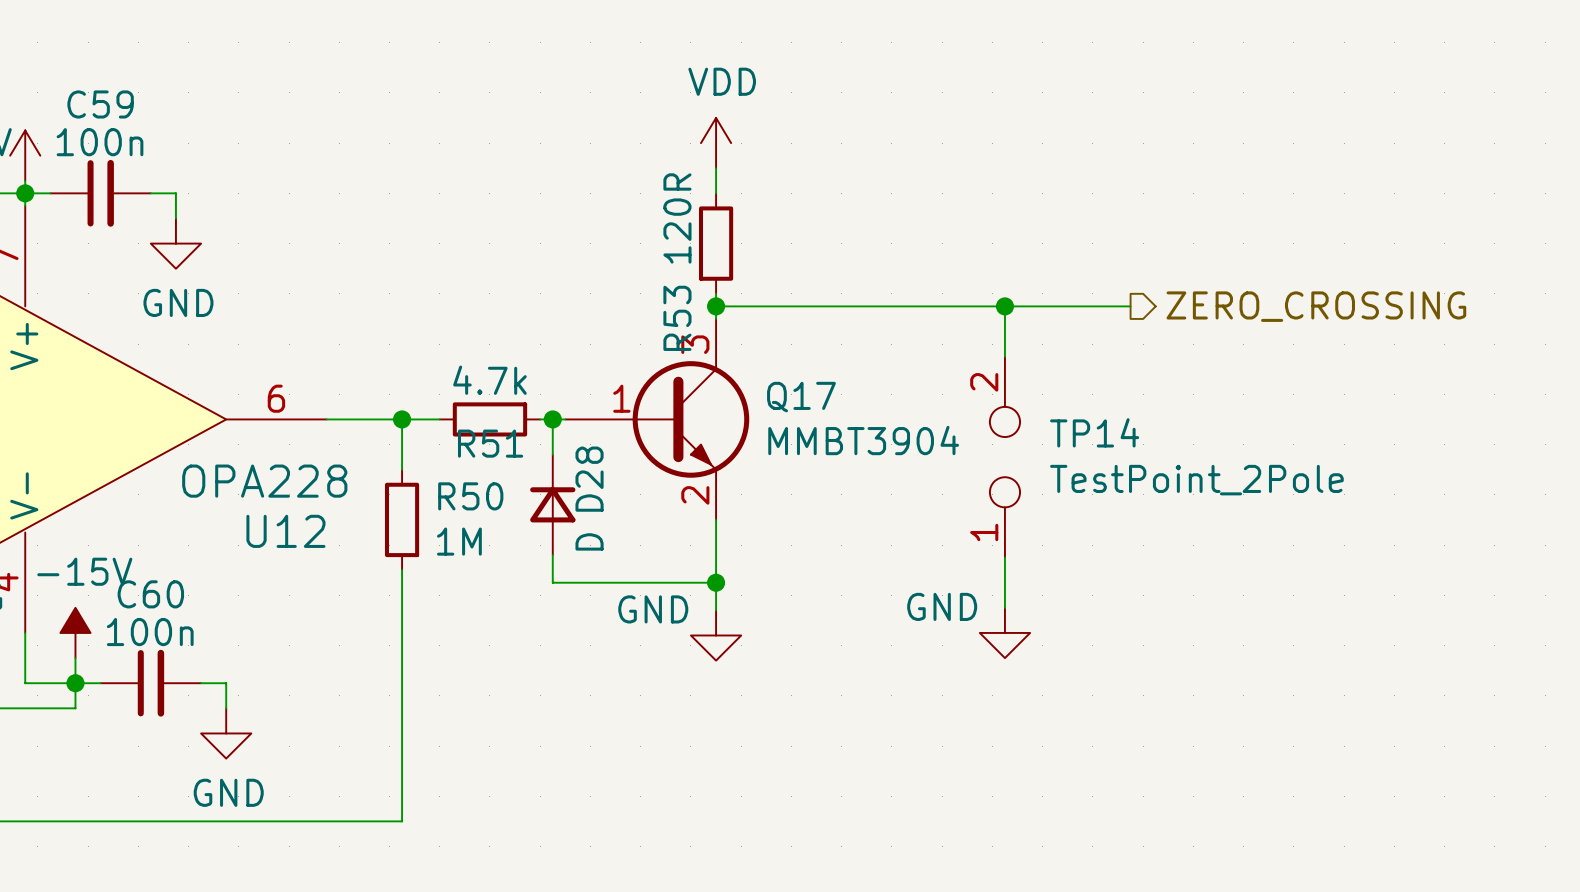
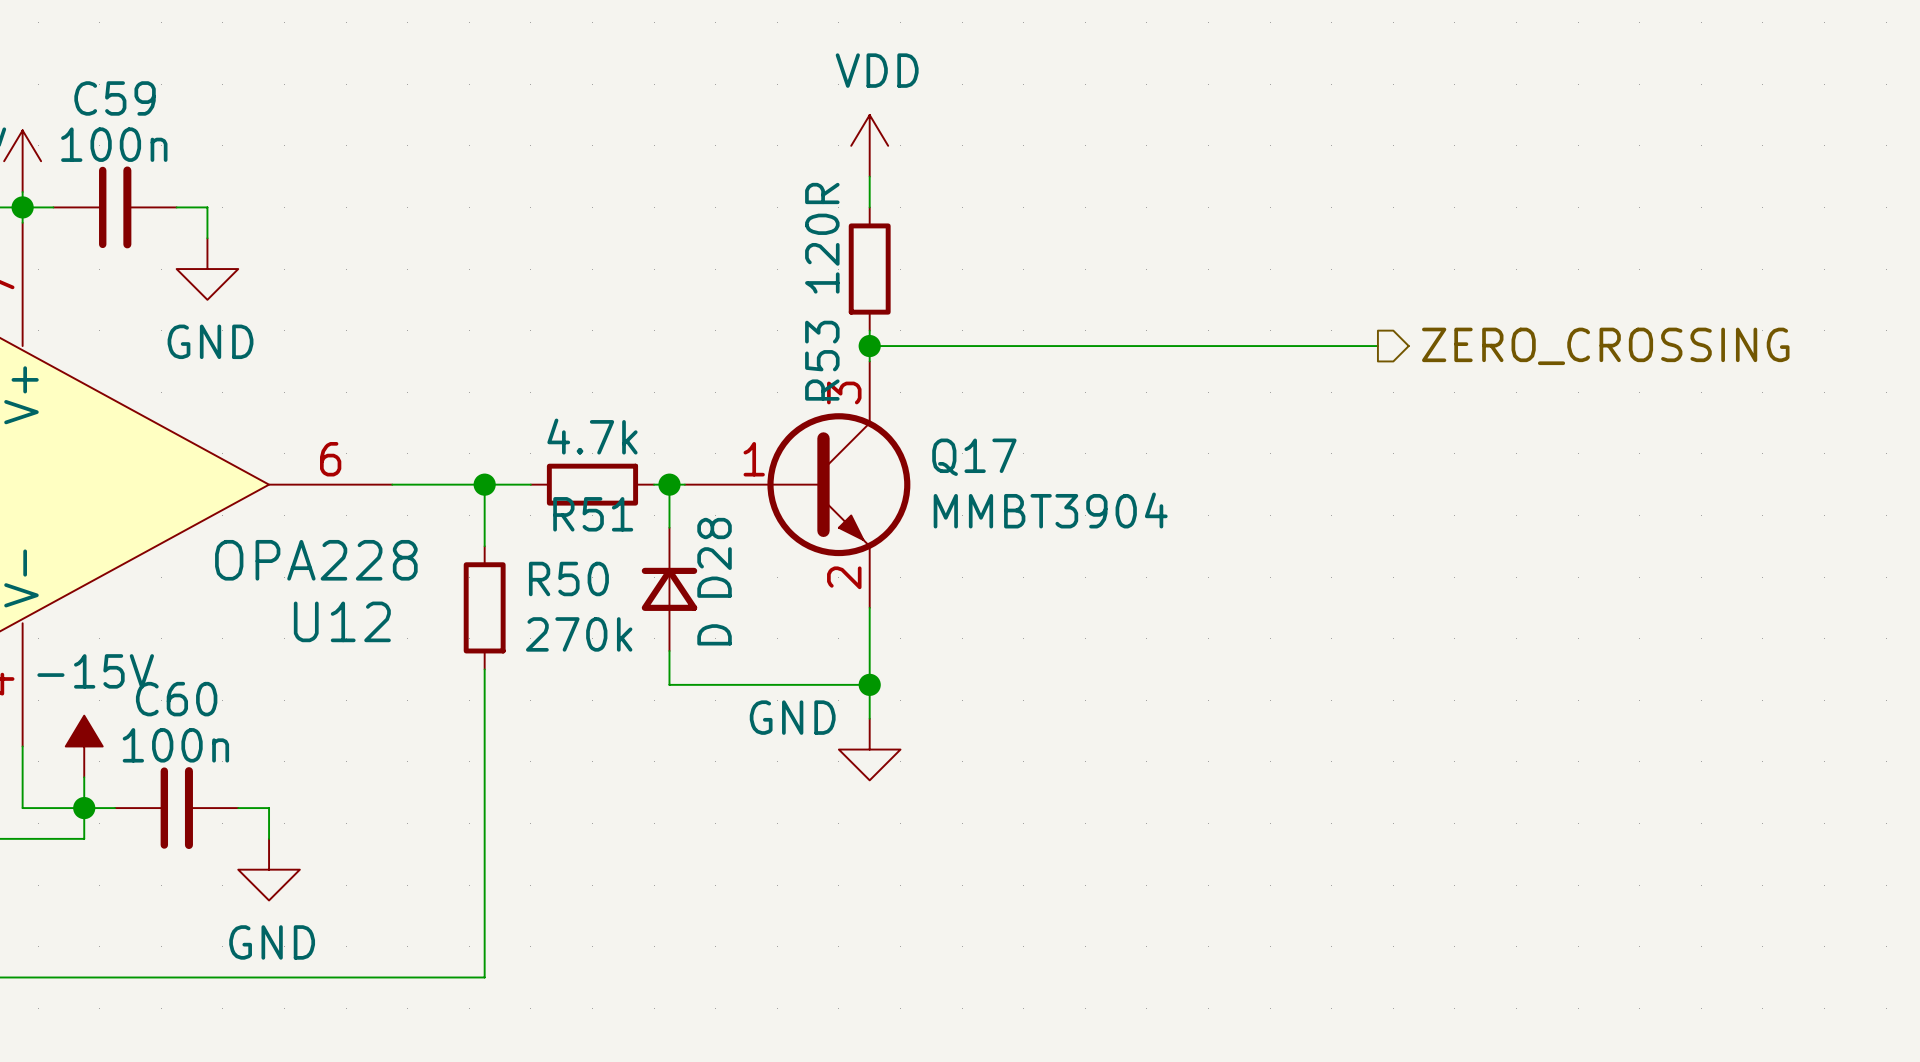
wire: (1004, 306) (1004, 356) -> none
junction: (1004, 306) -> none
TP14: TestPoint_2Pole (1004, 457) -> none
R50 value: 1M (459, 541) -> 270k (579, 634)
wire: (1004, 557) (1004, 607) -> none
power symbol: GND (1004, 632) -> none

